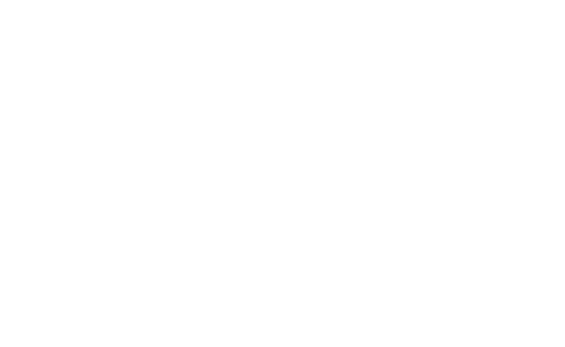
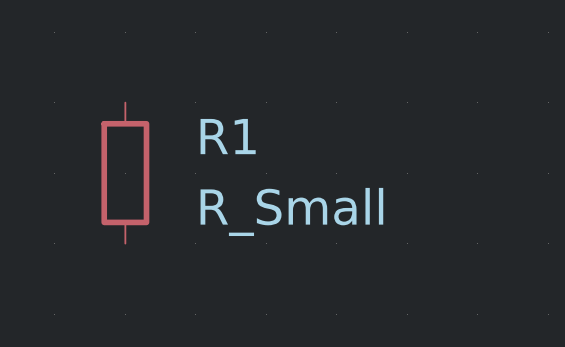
R1: none -> R_Small (125, 173)

